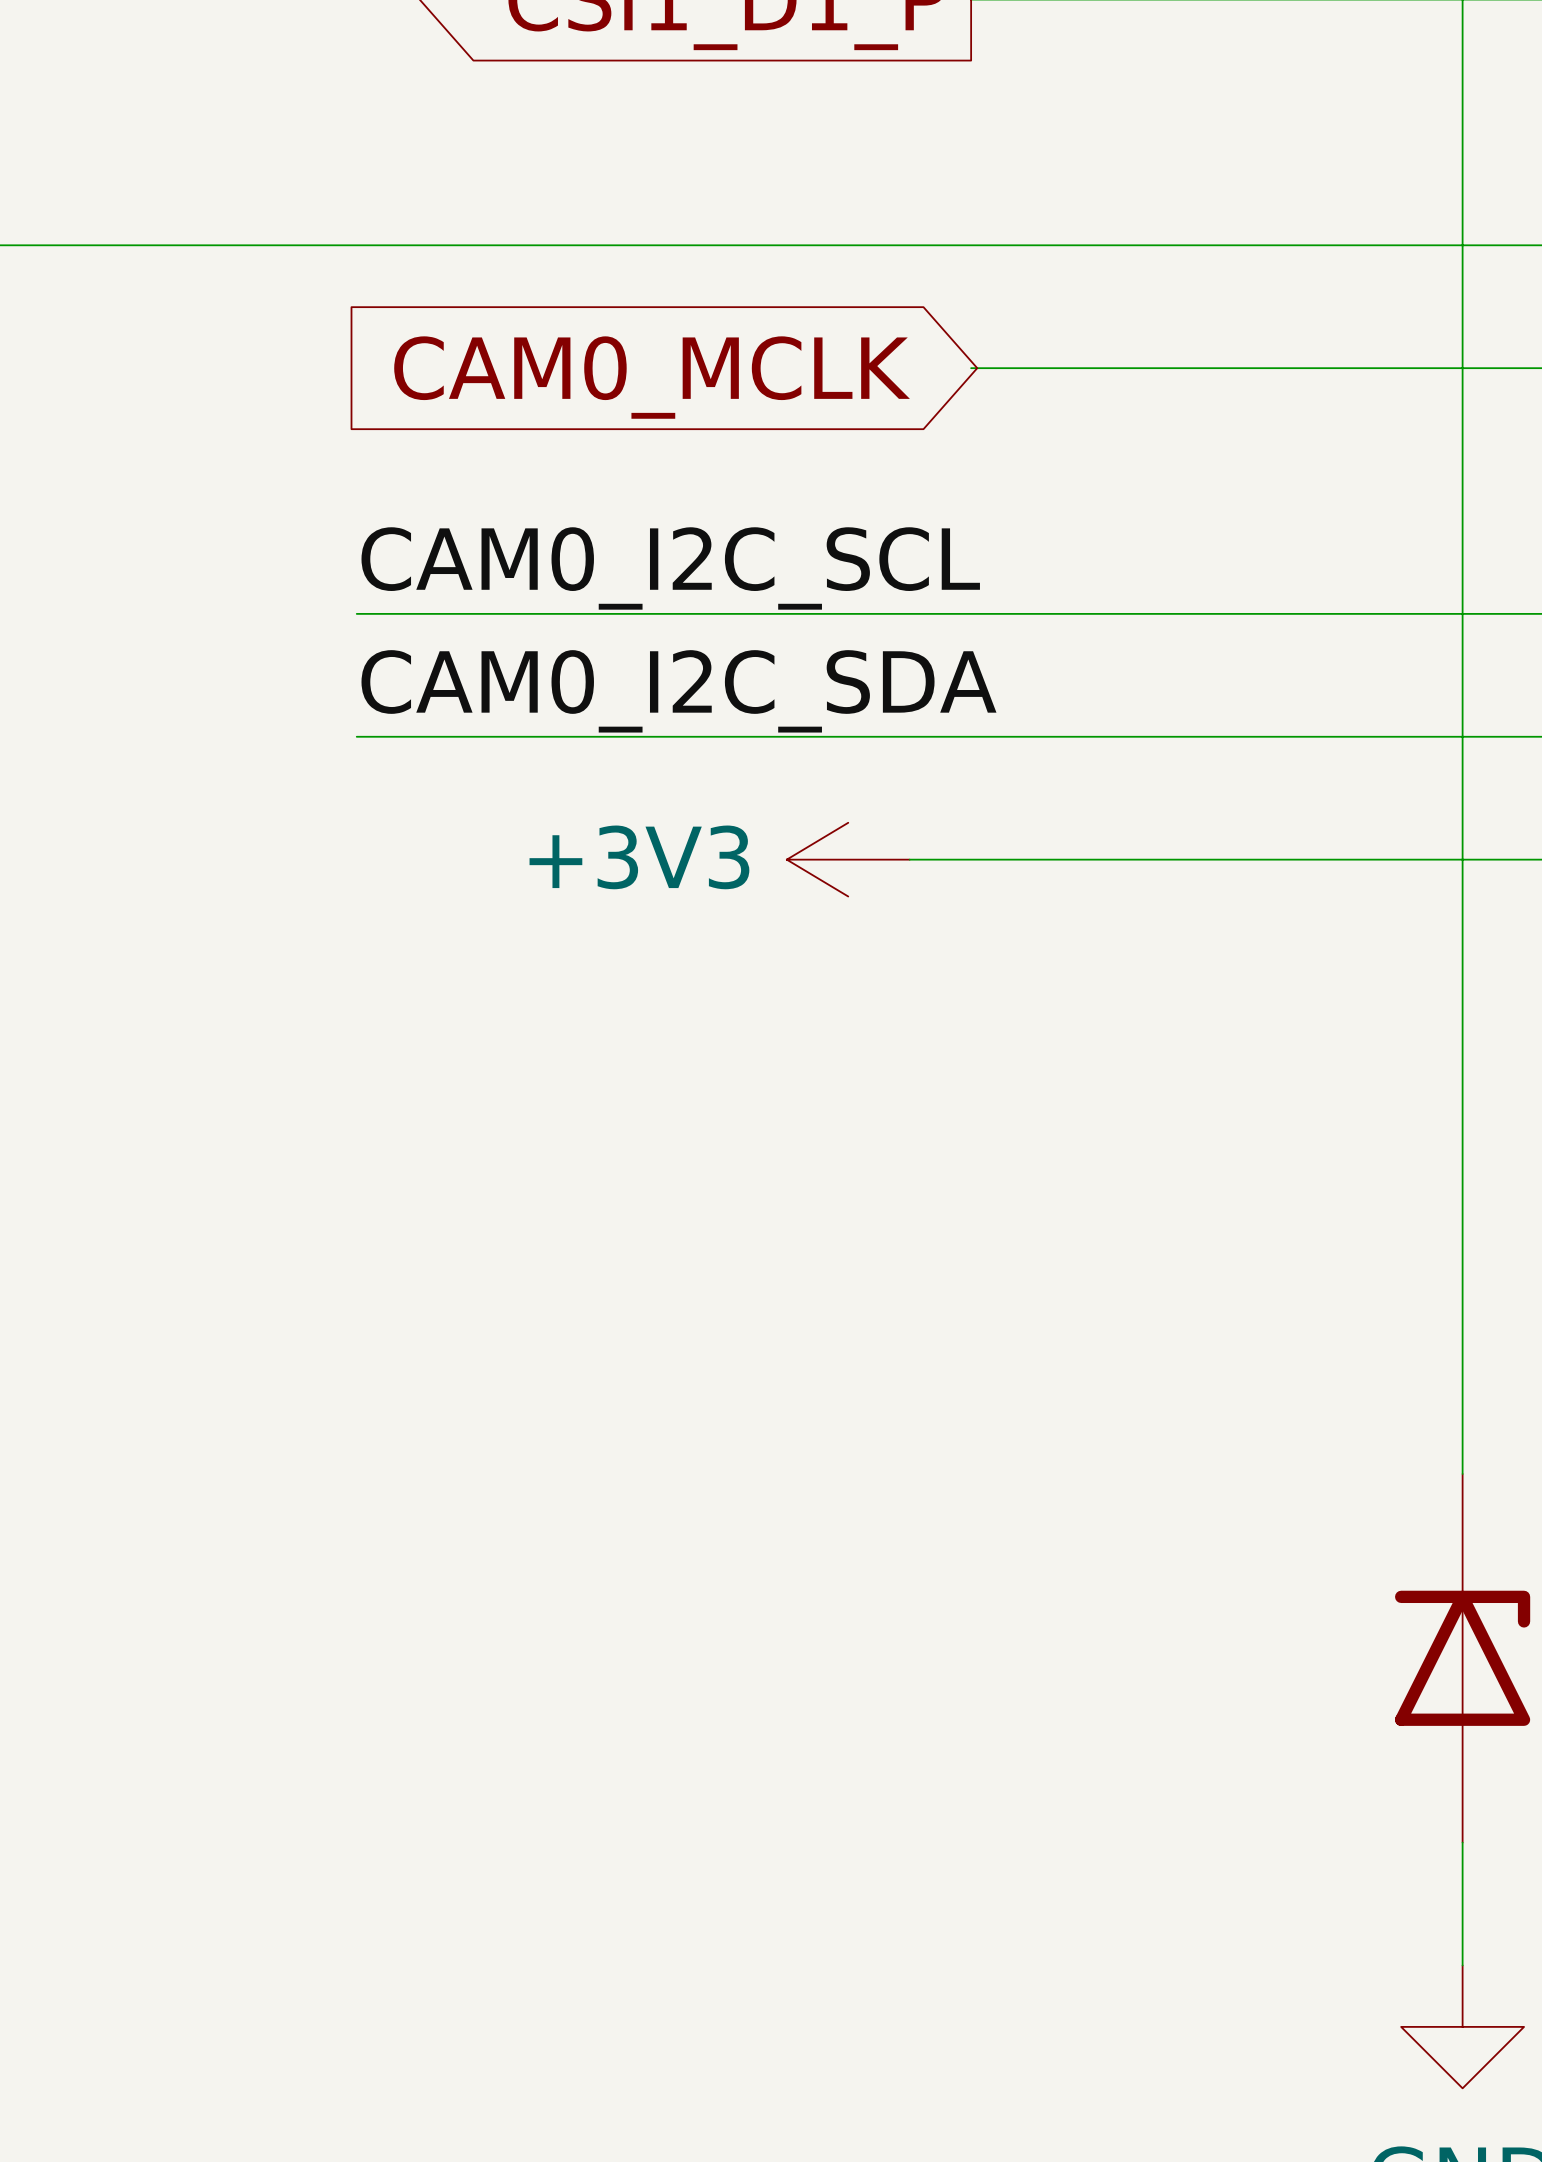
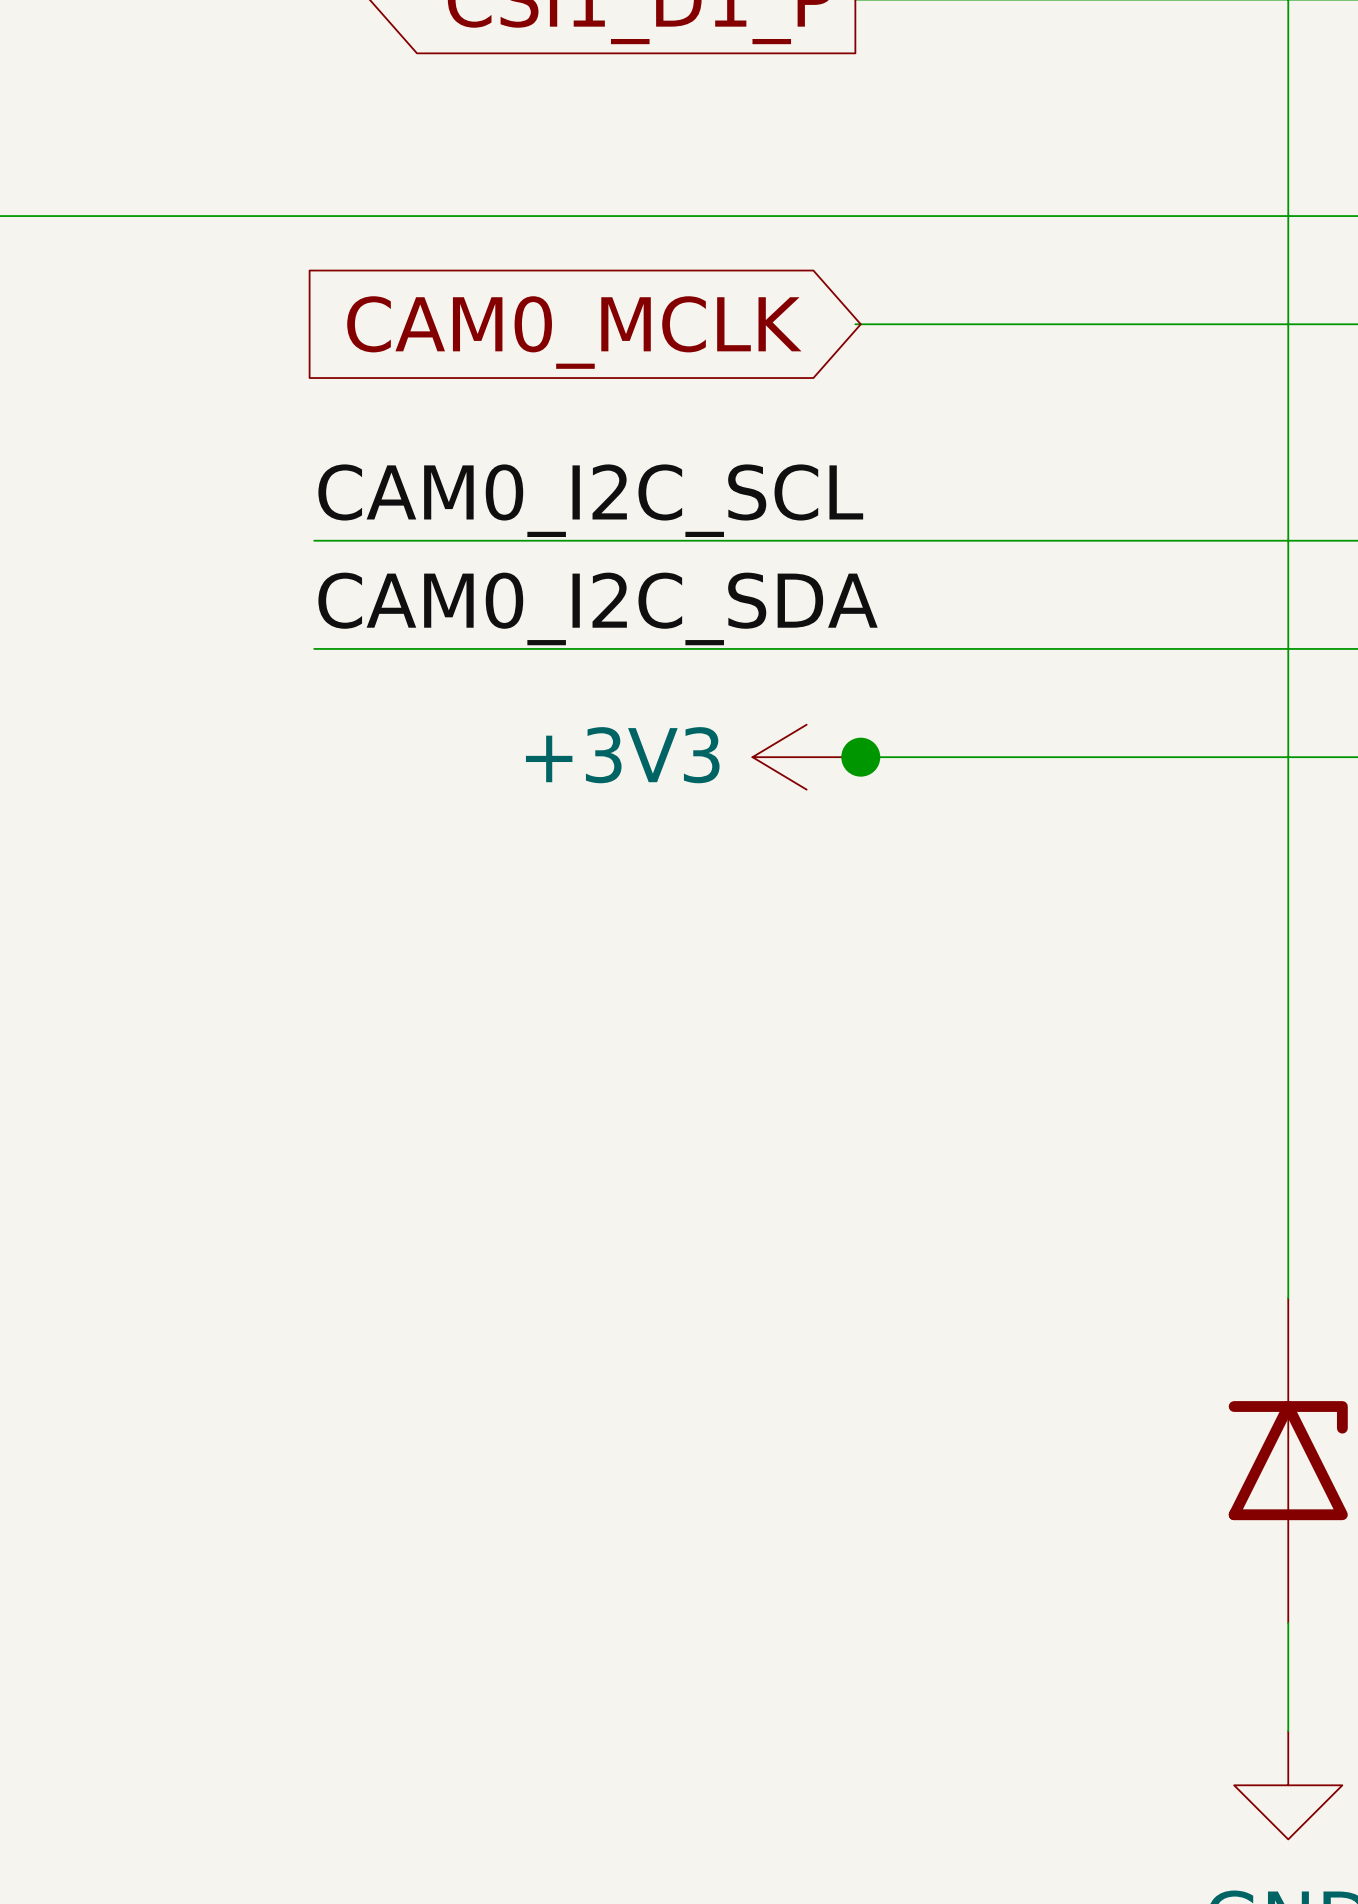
power symbol position: +3V3 (848, 859) -> +3V3 (806, 757)
junction: none -> (860, 757)

